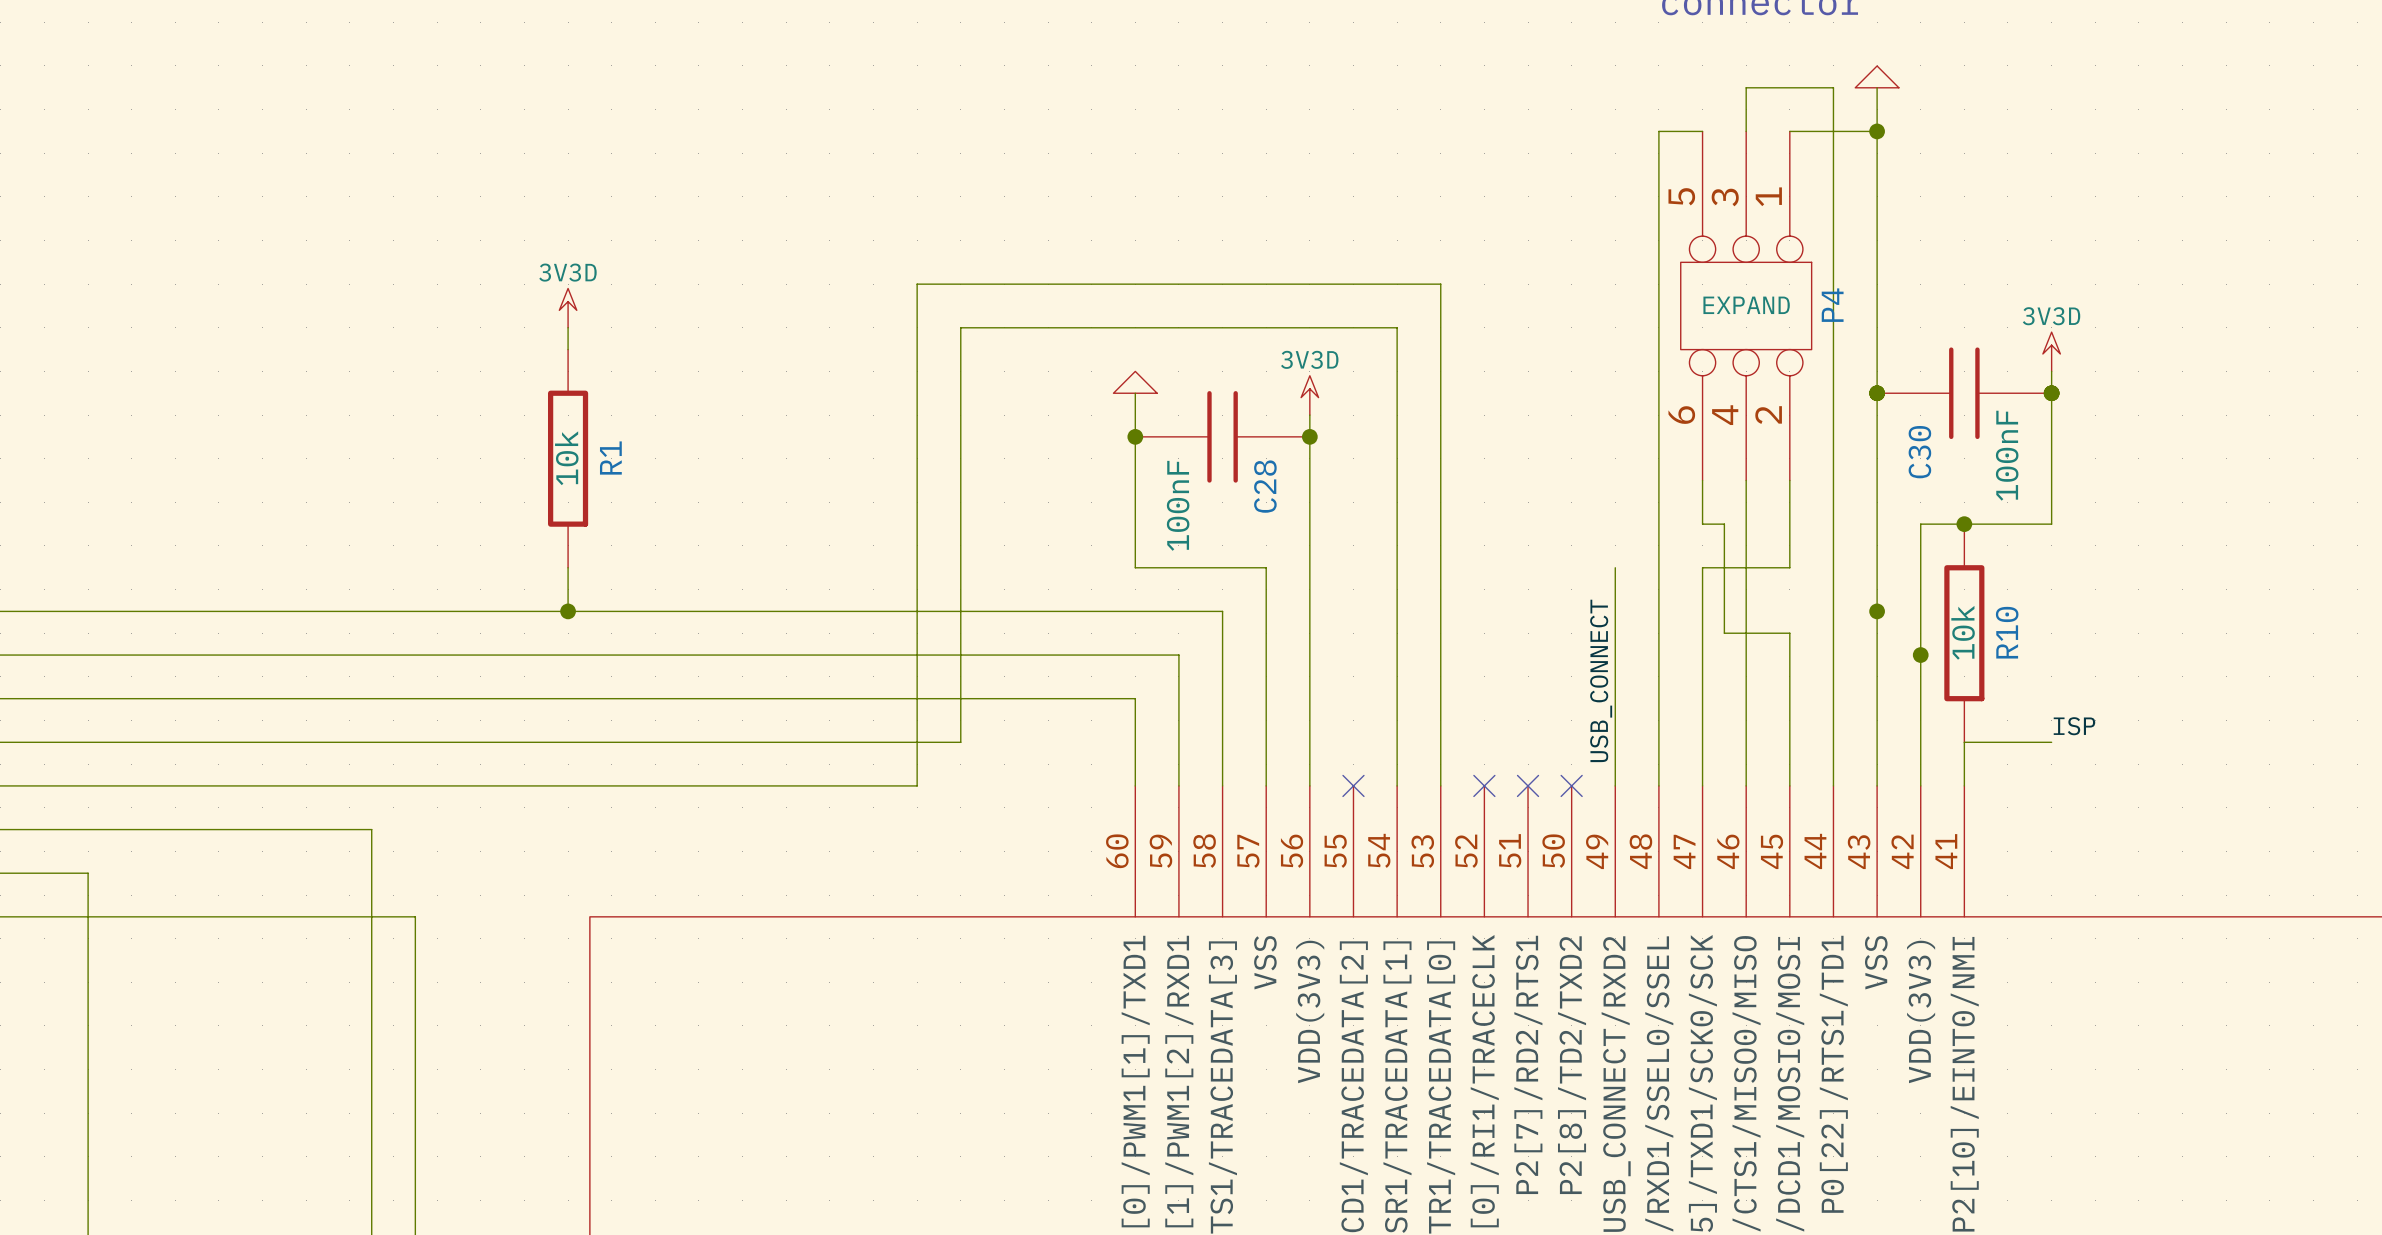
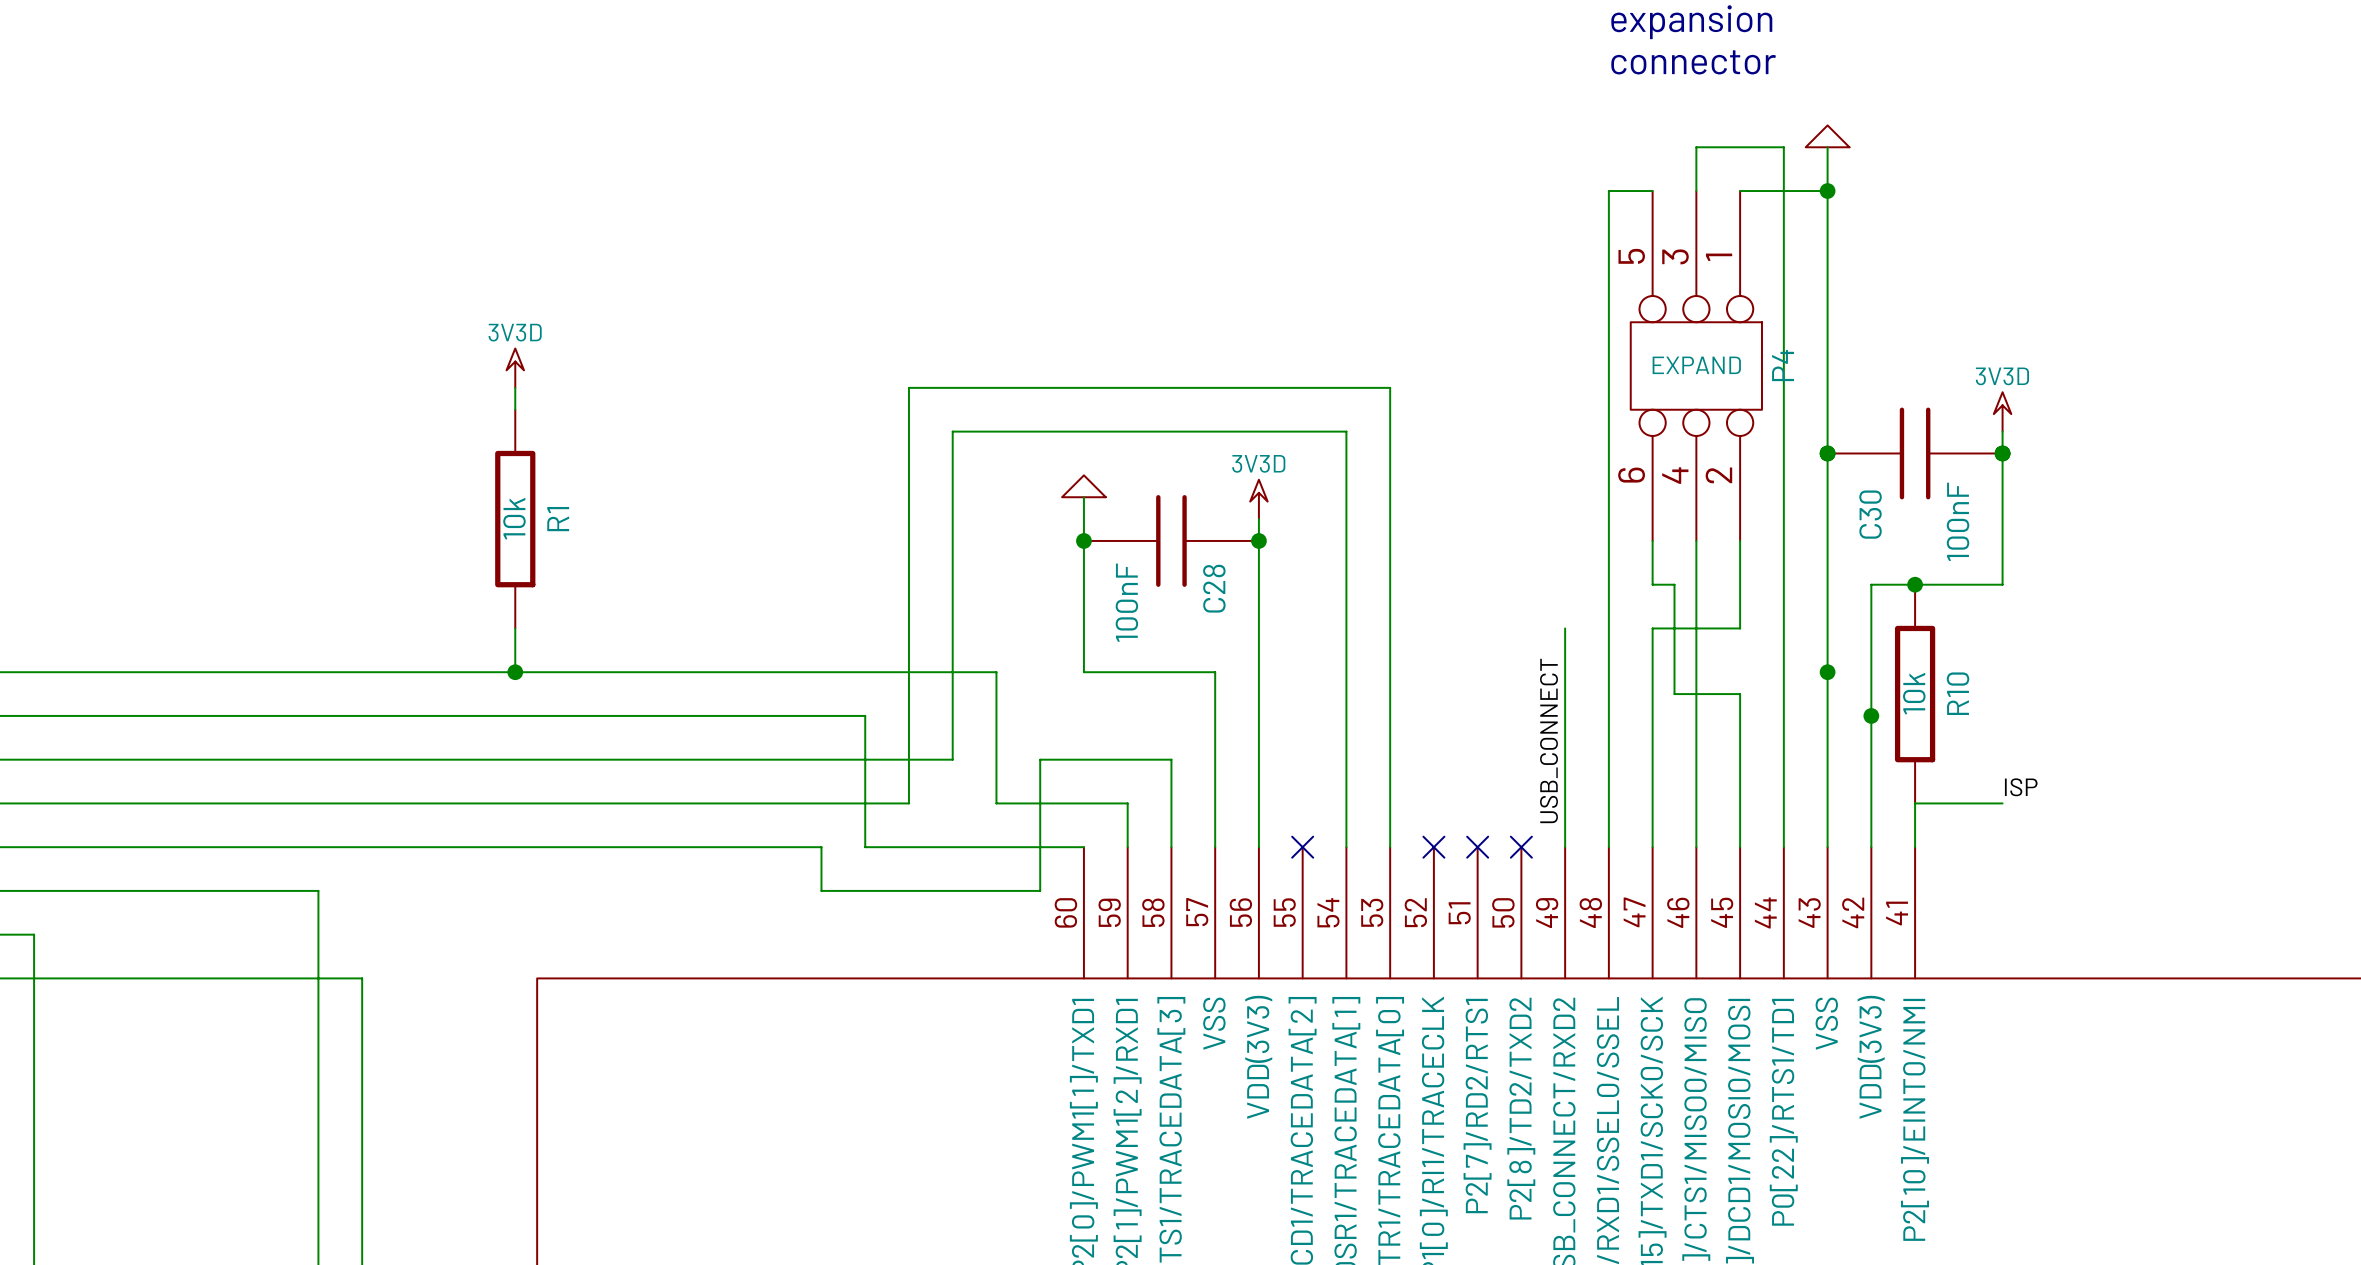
wire: (1397, 327) (1397, 371) -> (1346, 387) (1390, 387)
wire: (1440, 327) (1440, 284) (917, 284) (917, 655) (1178, 655) (1178, 742) -> (996, 672) (996, 803) (1127, 803)
wire: none -> (1346, 431) (952, 431) (952, 759)
power symbol position: (1135, 382) -> (1083, 486)
wire: (1135, 393) (1135, 436) -> none
power symbol position: 3V3D (1309, 395) -> 3V3D (1258, 499)
junction position: (1135, 436) -> (1083, 540)
C28 position: (1222, 436) -> (1171, 540)
junction position: (1309, 436) -> (1258, 540)
wire: (1135, 567) (1266, 567) (1266, 611) -> none
wire: (1048, 611) (1135, 611) -> (1083, 628) (1083, 672)
wire: (1222, 611) (1222, 698) -> (1171, 672) (1215, 672)
wire: (1004, 698) (1091, 698) -> (821, 847) (821, 890) (1040, 890) (1040, 759)
wire: (1135, 698) (1135, 785) -> (1083, 759) (1171, 759)
wire: (873, 785) (917, 785) -> (1083, 847) (865, 847)

